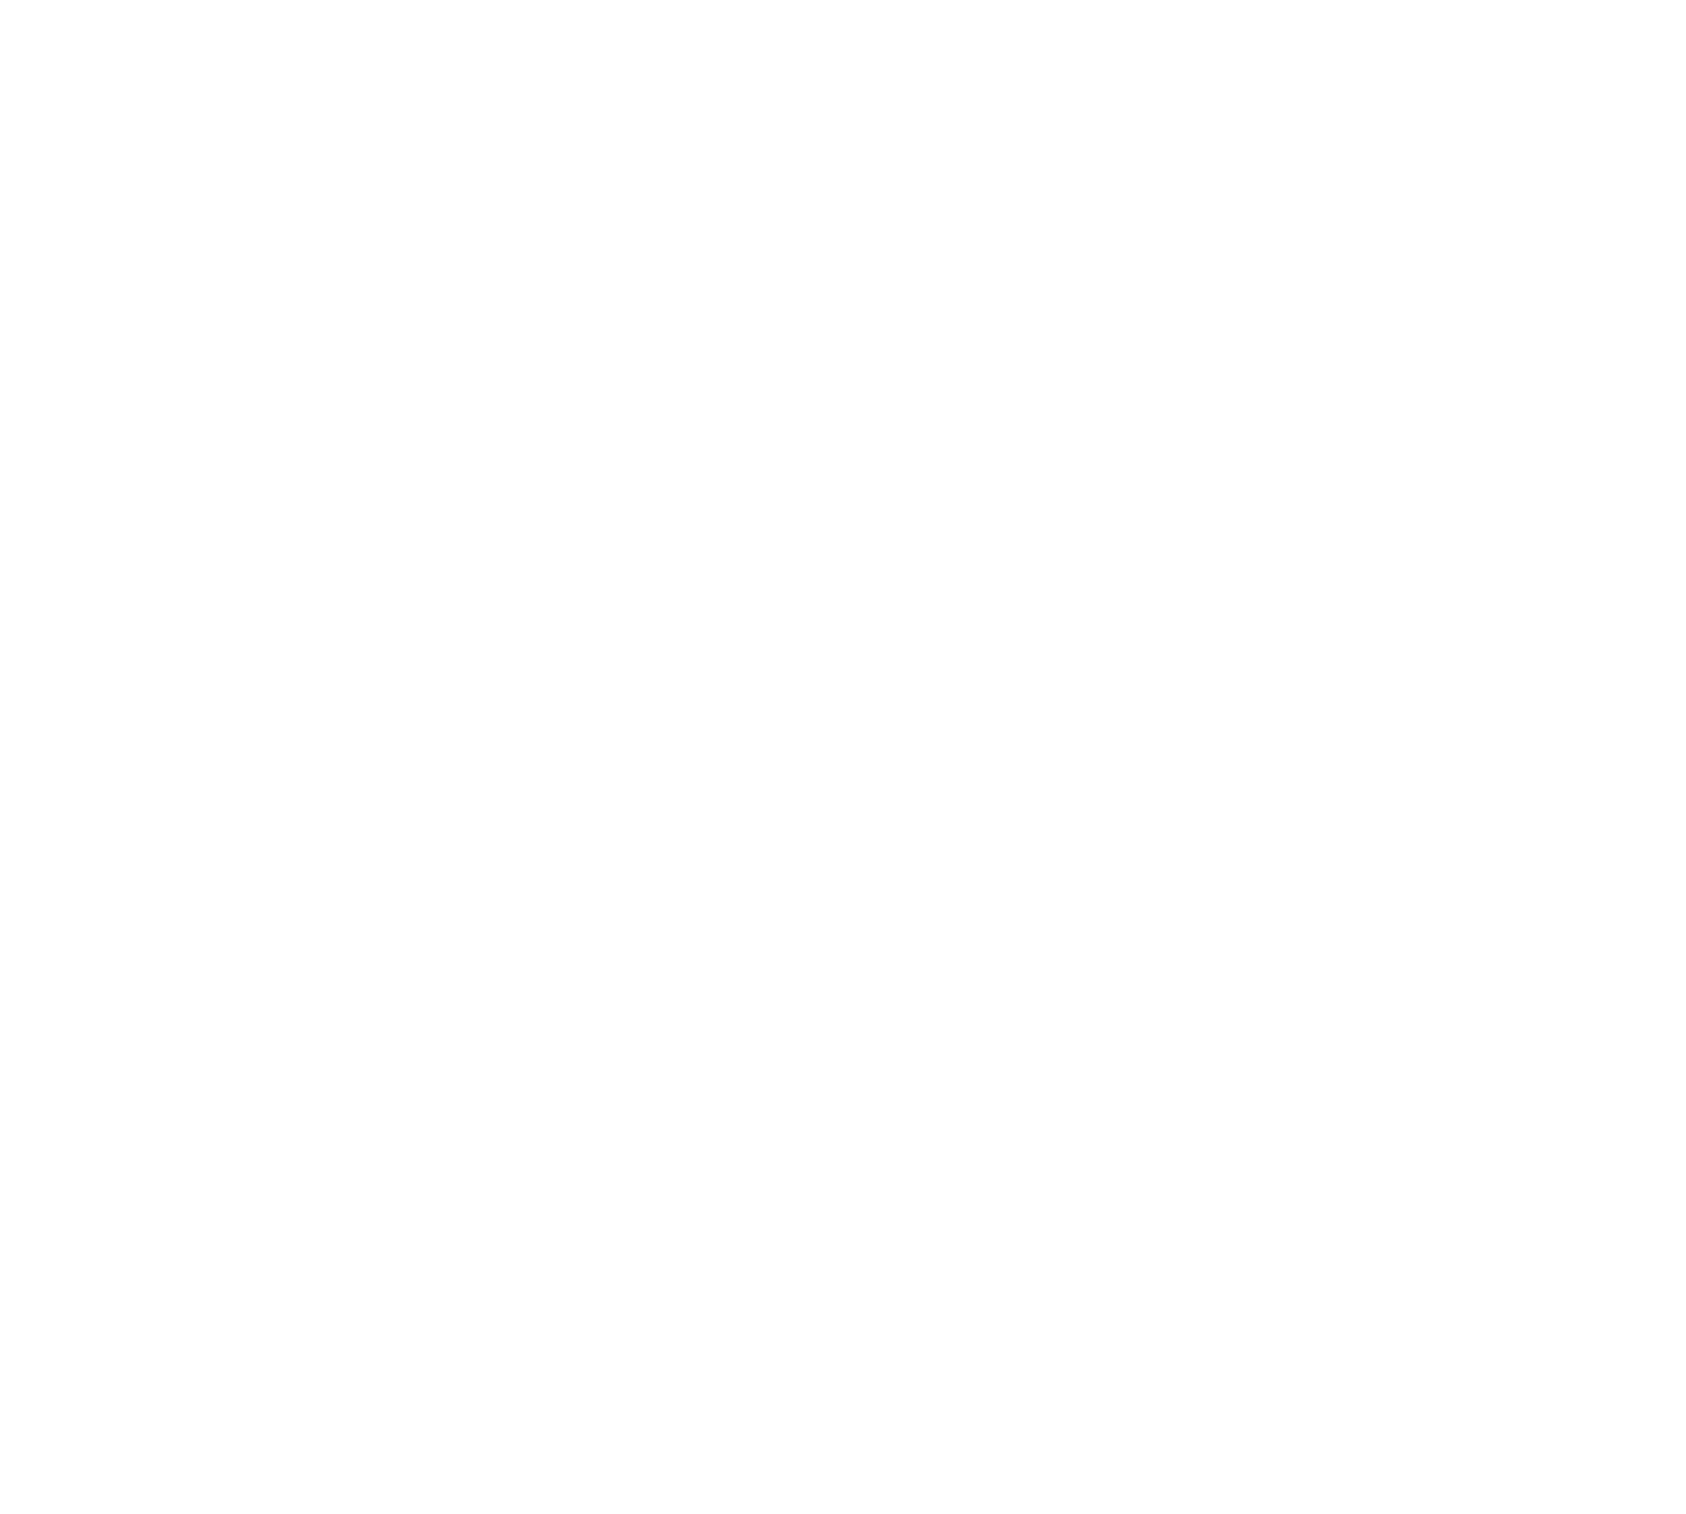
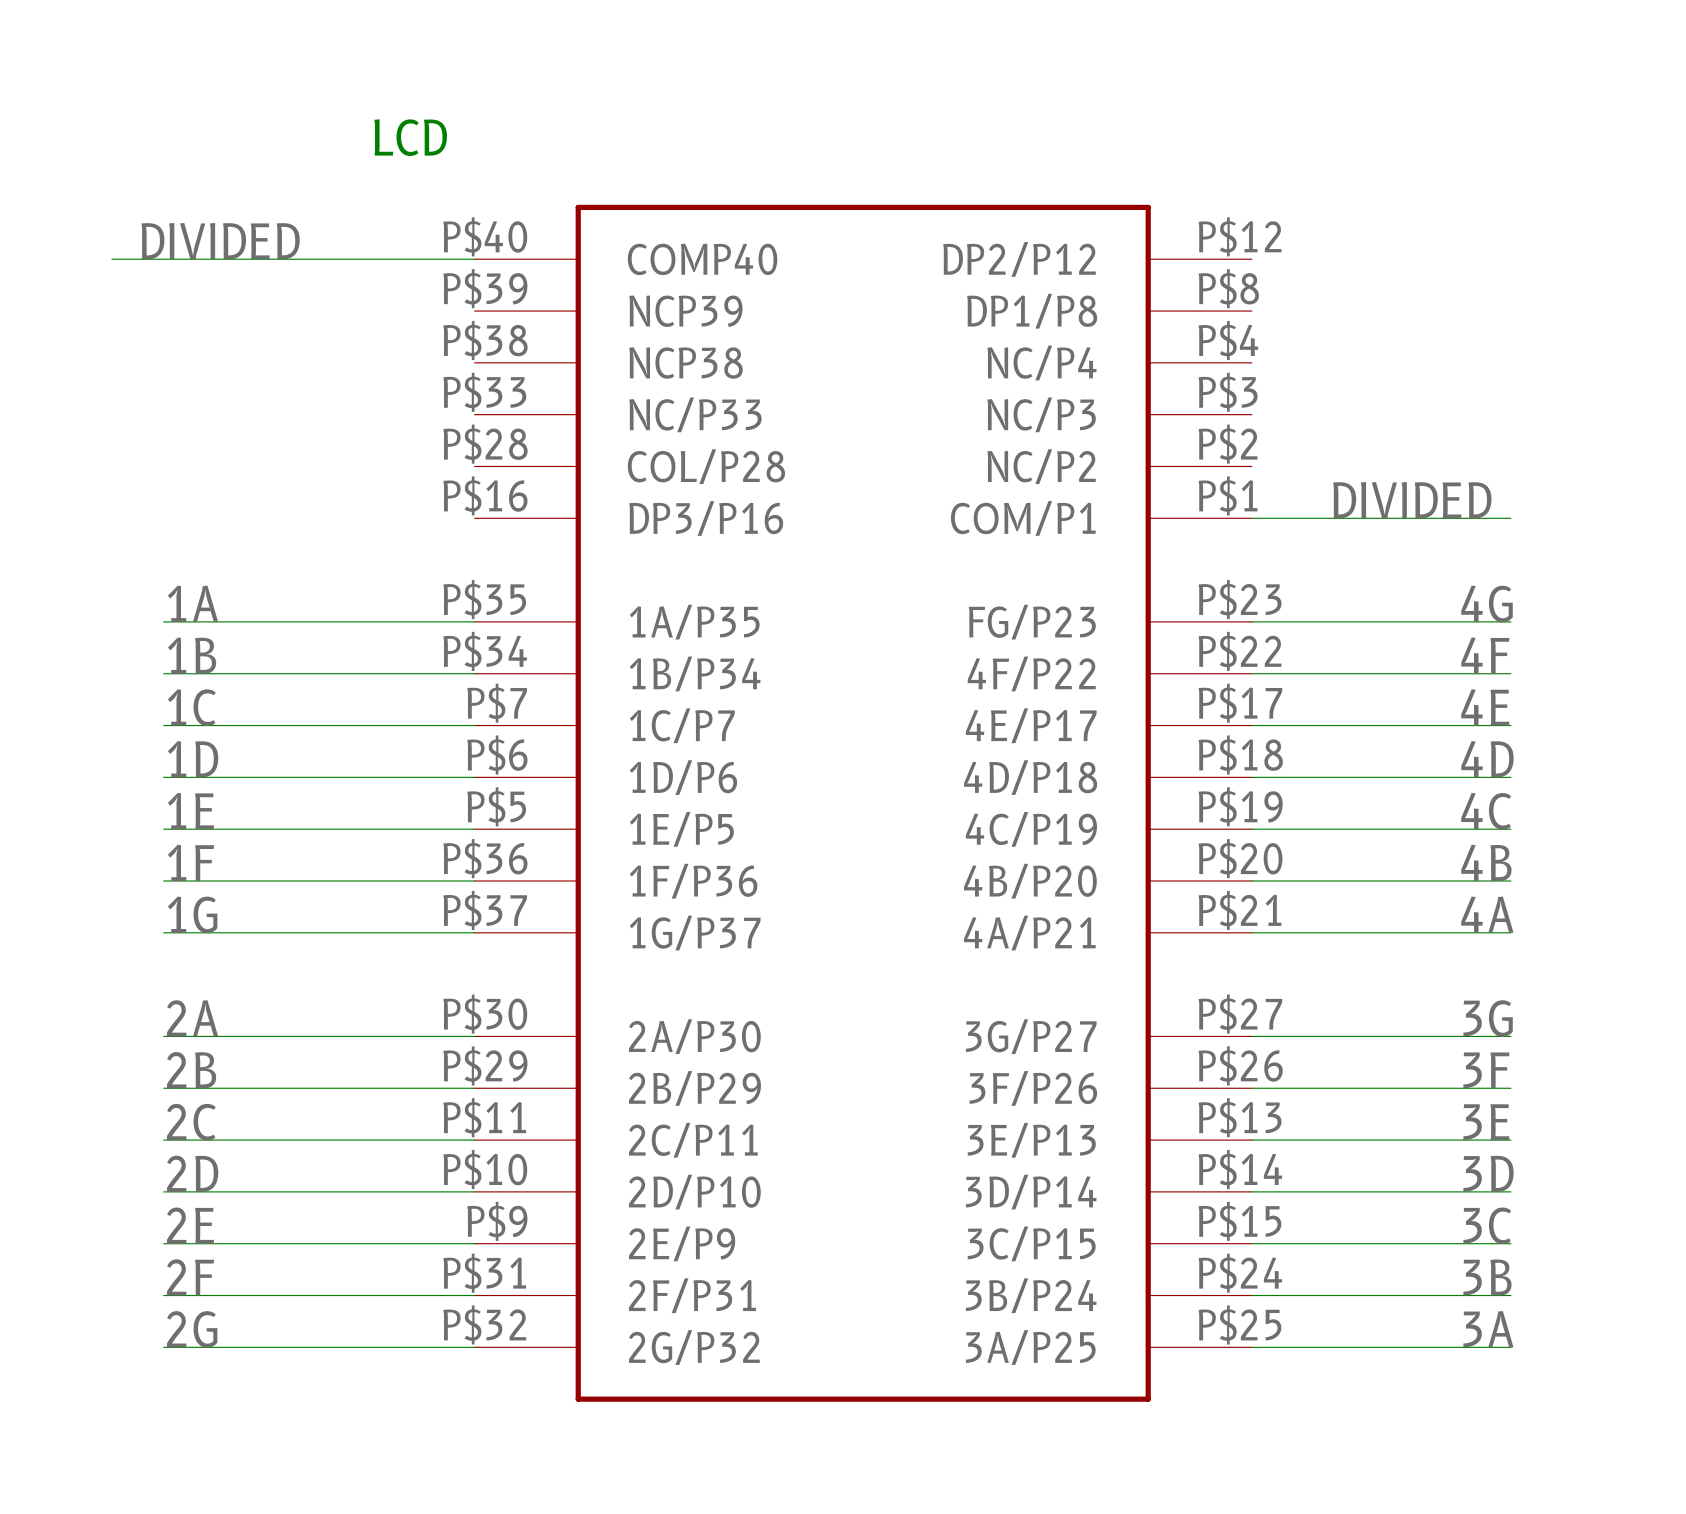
text: none -> LCD (410, 137)
label: none -> DIVIDED (220, 241)
wire: none -> (111, 259) (474, 259)
label: none -> DIVIDED (1412, 500)
wire: none -> (1251, 518) (1510, 518)
label: none -> 1A (193, 603)
label: none -> 4G (1487, 603)
wire: none -> (163, 621) (474, 621)
wire: none -> (1251, 621) (1510, 621)
label: none -> 1B (192, 655)
label: none -> 4F (1485, 655)
wire: none -> (163, 673) (474, 673)
wire: none -> (1251, 673) (1510, 673)
label: none -> 1C (191, 707)
label: none -> 4E (1485, 707)
wire: none -> (163, 725) (474, 725)
wire: none -> (1251, 725) (1510, 725)
label: none -> 1D (193, 759)
label: none -> 4D (1487, 759)
wire: none -> (163, 777) (474, 777)
wire: none -> (1251, 777) (1510, 777)
part: none -> (863, 803)
label: none -> 1E (191, 811)
label: none -> 4C (1486, 811)
wire: none -> (163, 829) (474, 829)
wire: none -> (1251, 829) (1510, 829)
label: none -> 1F (191, 862)
label: none -> 4B (1486, 862)
wire: none -> (163, 881) (474, 881)
wire: none -> (1251, 881) (1510, 881)
label: none -> 1G (192, 914)
label: none -> 4A (1487, 914)
wire: none -> (163, 932) (474, 932)
wire: none -> (1251, 932) (1510, 932)
label: none -> 2A (192, 1018)
label: none -> 3G (1488, 1018)
wire: none -> (163, 1036) (474, 1036)
wire: none -> (1251, 1036) (1510, 1036)
label: none -> 2B (191, 1070)
label: none -> 3F (1486, 1070)
wire: none -> (163, 1088) (474, 1088)
wire: none -> (1251, 1088) (1510, 1088)
label: none -> 2C (191, 1122)
label: none -> 3E (1486, 1122)
wire: none -> (163, 1140) (474, 1140)
wire: none -> (1251, 1140) (1510, 1140)
label: none -> 2D (192, 1173)
label: none -> 3D (1488, 1173)
wire: none -> (163, 1191) (474, 1191)
wire: none -> (1251, 1191) (1510, 1191)
label: none -> 2E (190, 1225)
label: none -> 3C (1487, 1225)
wire: none -> (163, 1243) (474, 1243)
wire: none -> (1251, 1243) (1510, 1243)
label: none -> 2F (190, 1277)
label: none -> 3B (1487, 1277)
wire: none -> (163, 1295) (474, 1295)
wire: none -> (1251, 1295) (1510, 1295)
label: none -> 2G (192, 1329)
label: none -> 3A (1488, 1329)
wire: none -> (163, 1347) (474, 1347)
wire: none -> (1251, 1347) (1510, 1347)

